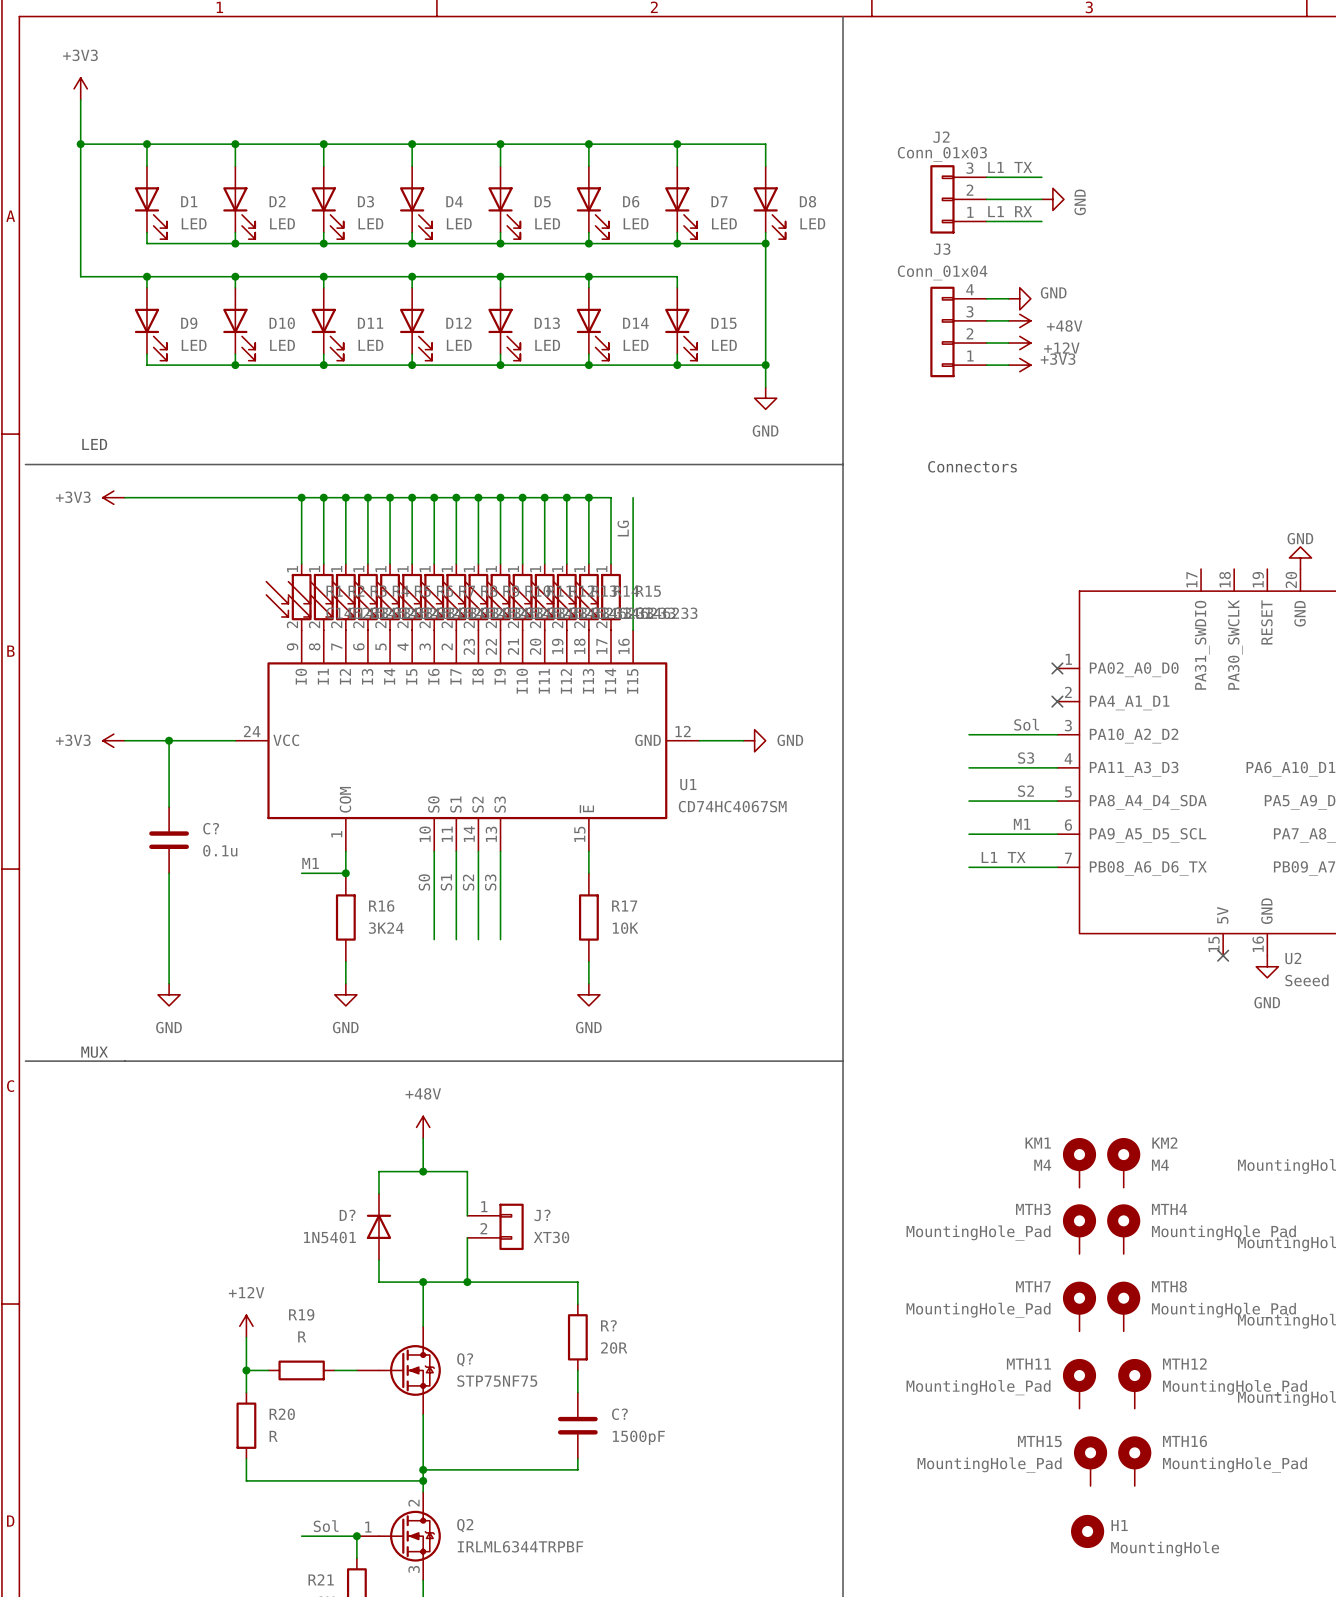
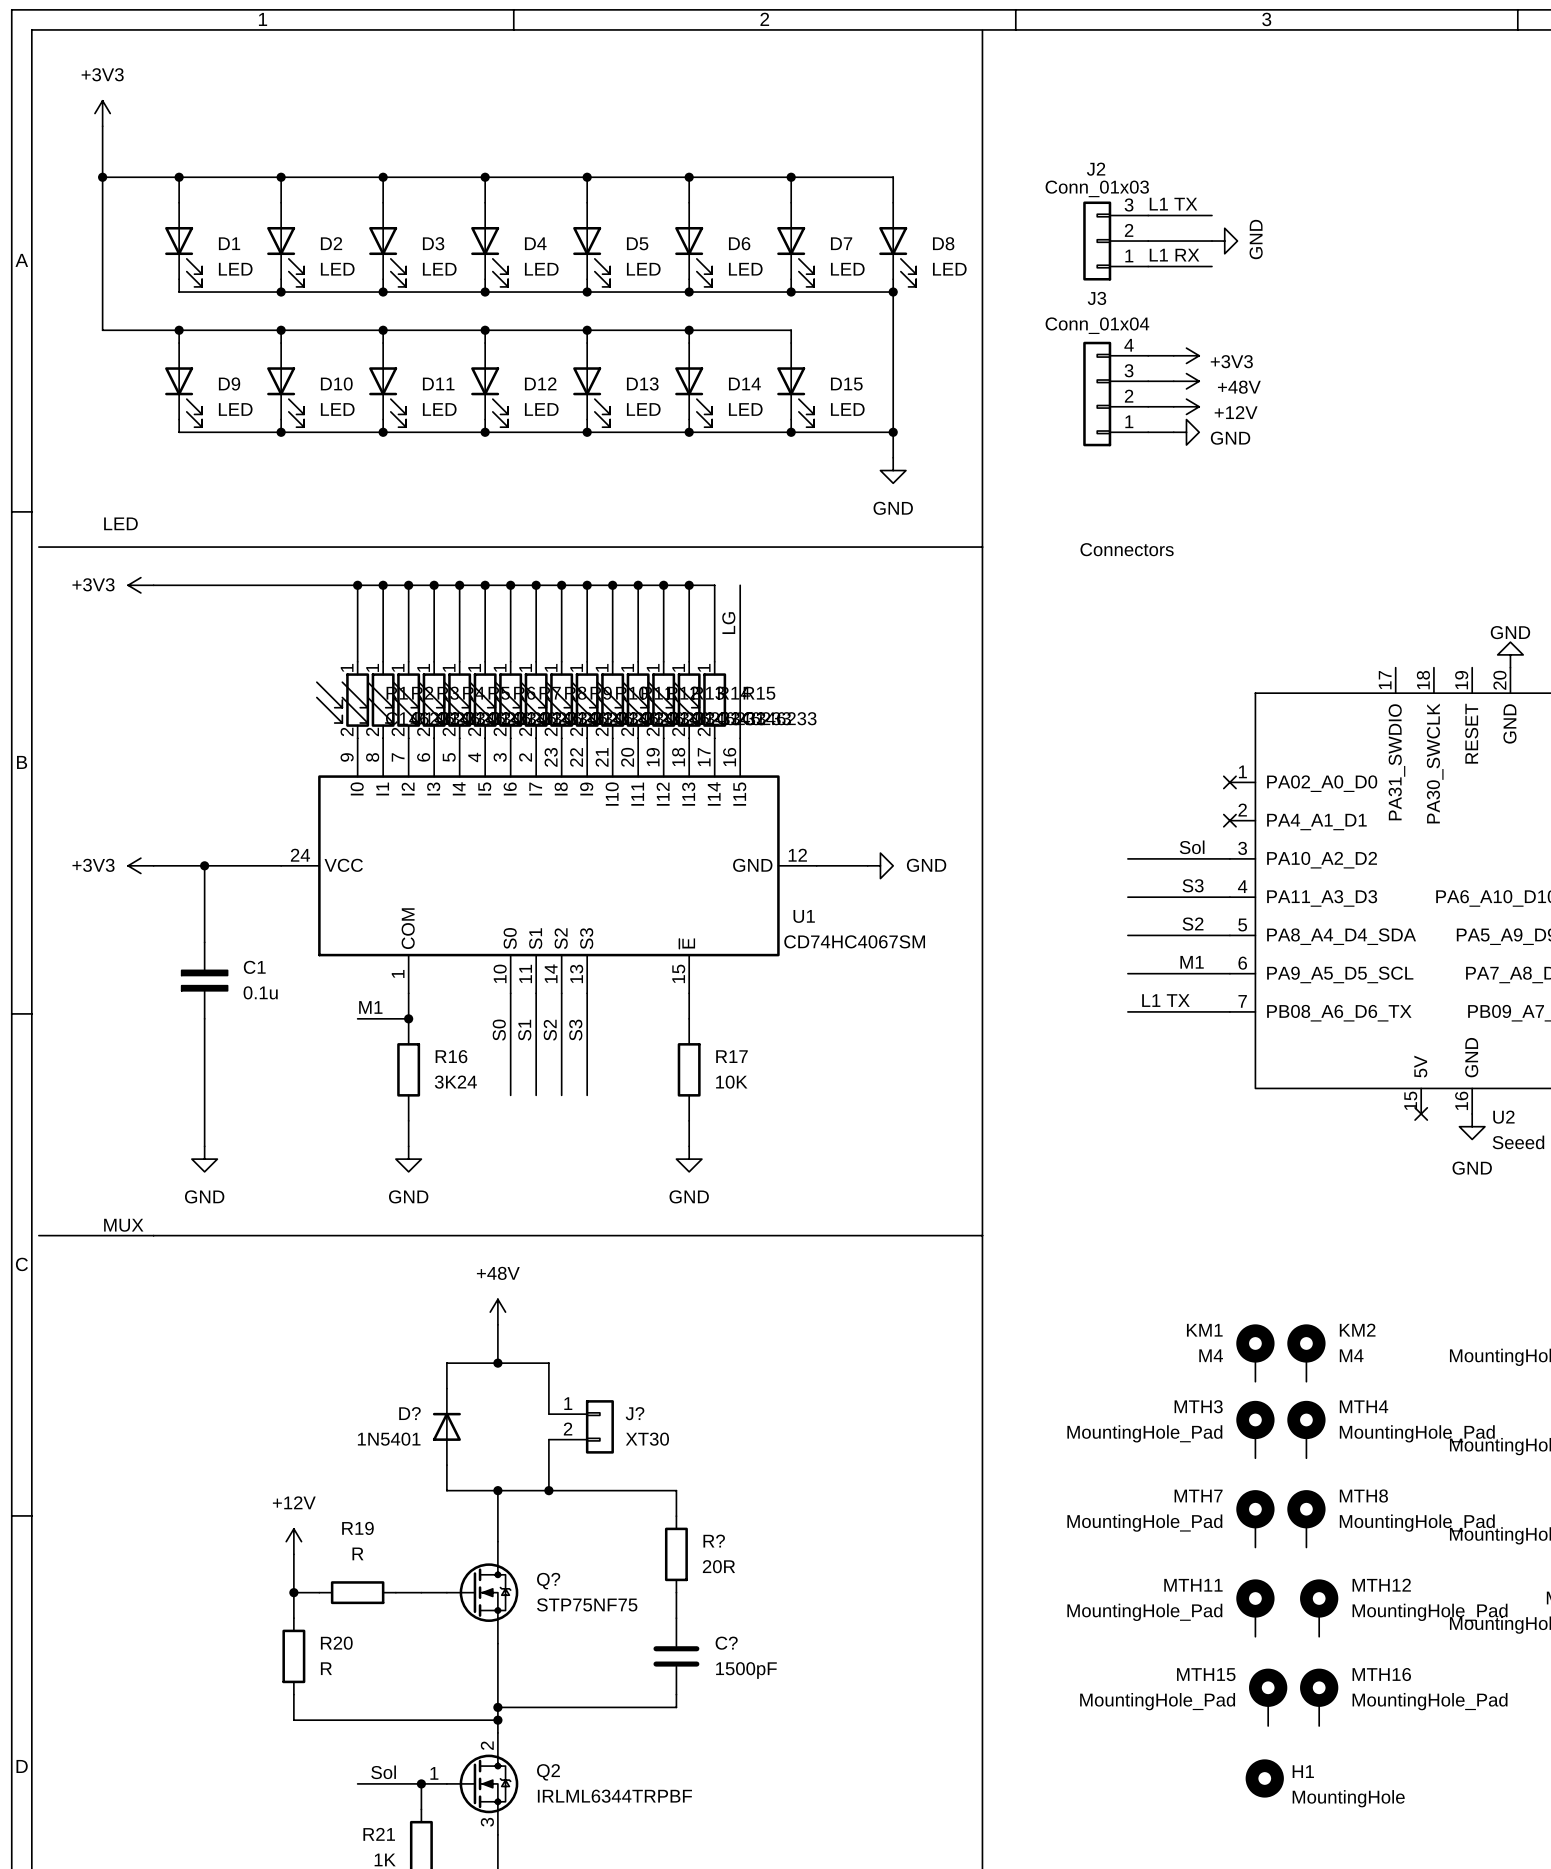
power symbol: GND (1019, 298) -> +3V3 (1186, 355)
power symbol: +3V3 (1019, 365) -> GND (1186, 432)
C?: 0.1u (169, 840) -> none
C1: none -> 0.1u (204, 980)

